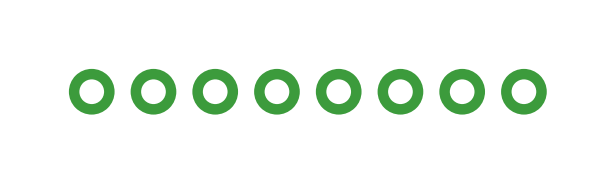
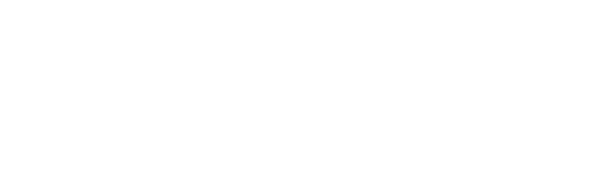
part: (307, 91) -> none

